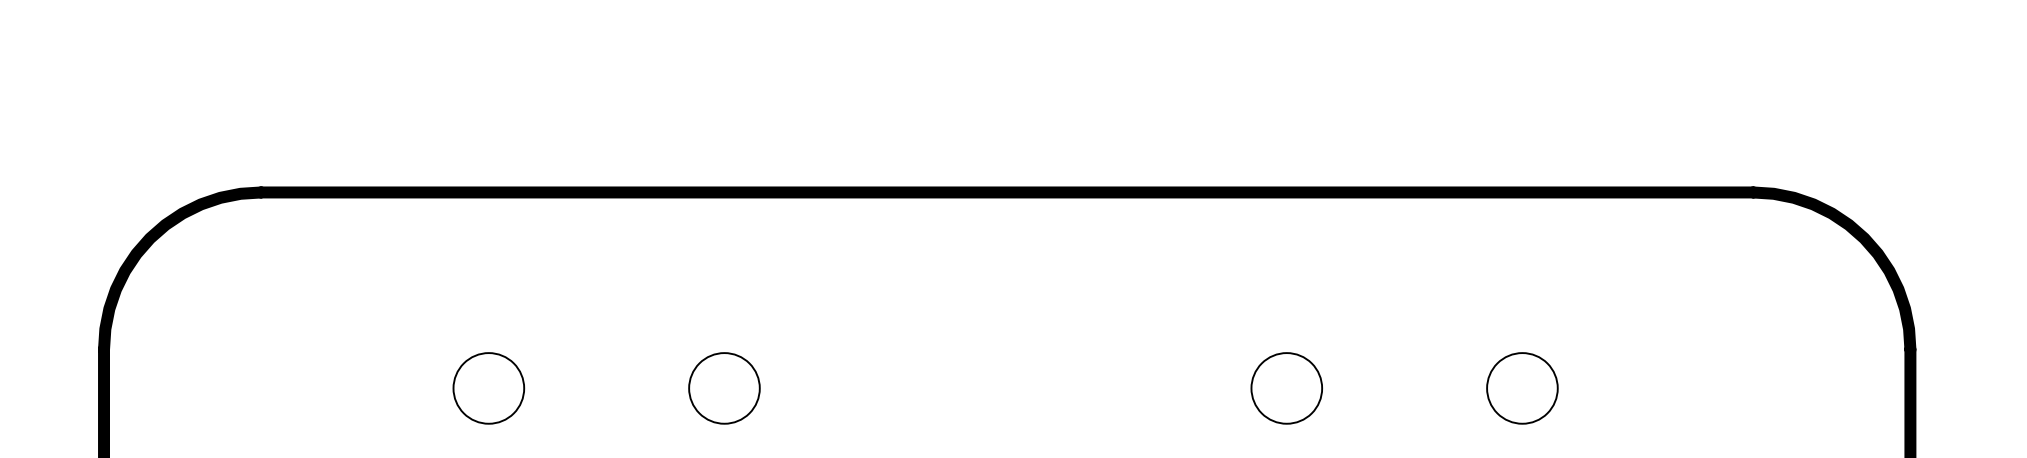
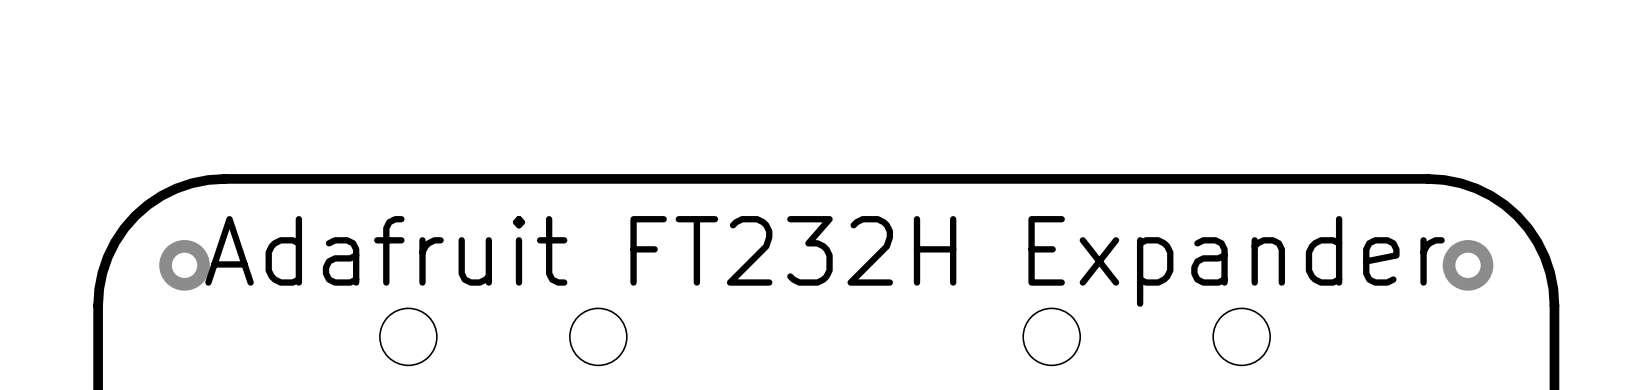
text: none -> Adafruit FT232H Expander (825, 261)
via: none -> (184, 265)
via: none -> (1468, 265)

